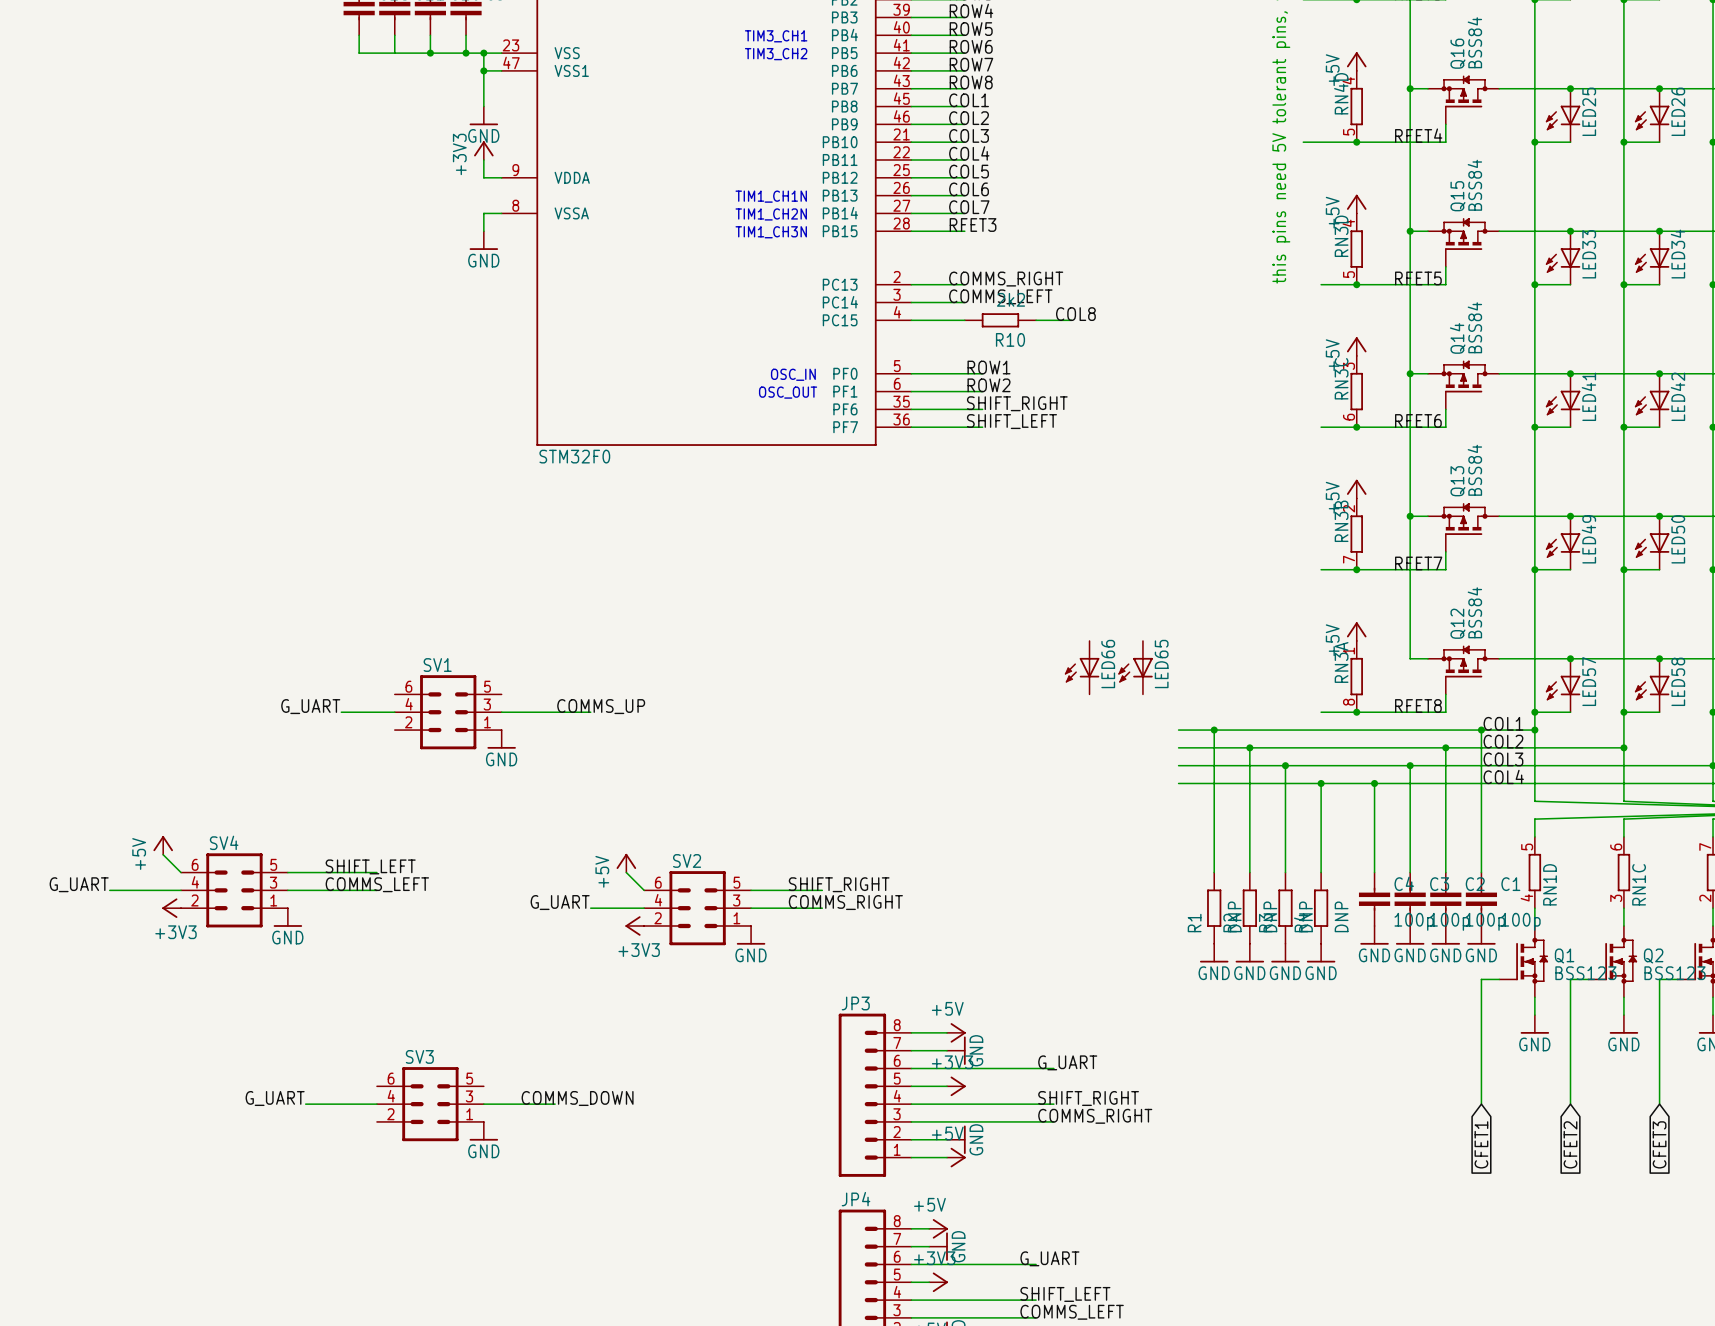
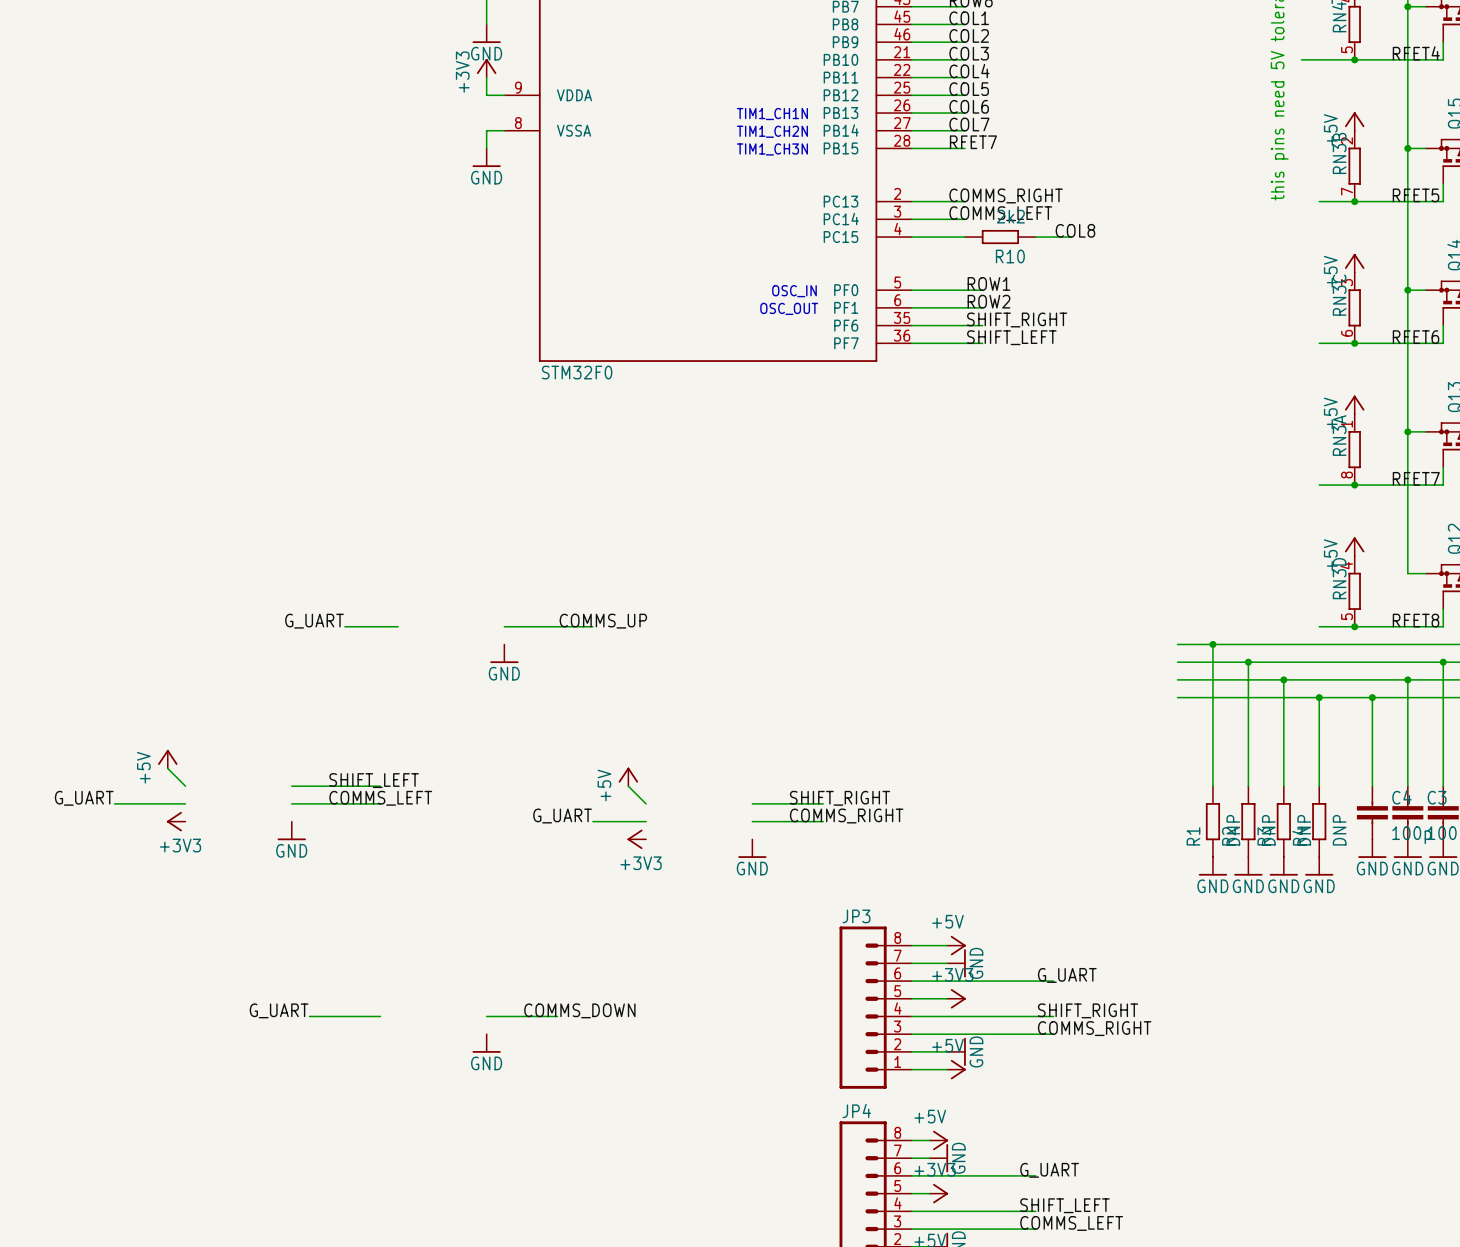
label: RFET3 (973, 225) -> RFET7 (973, 142)
RN3D position: (1356, 249) -> (1354, 591)
RN3B position: (1356, 534) -> (1354, 166)
LED66: (1082, 667) -> none
LED65: (1135, 667) -> none
RN3A position: (1356, 676) -> (1354, 449)
SV1: (448, 712) -> none
SV4: (234, 890) -> none
SV2: (697, 908) -> none
SV3: (430, 1104) -> none

